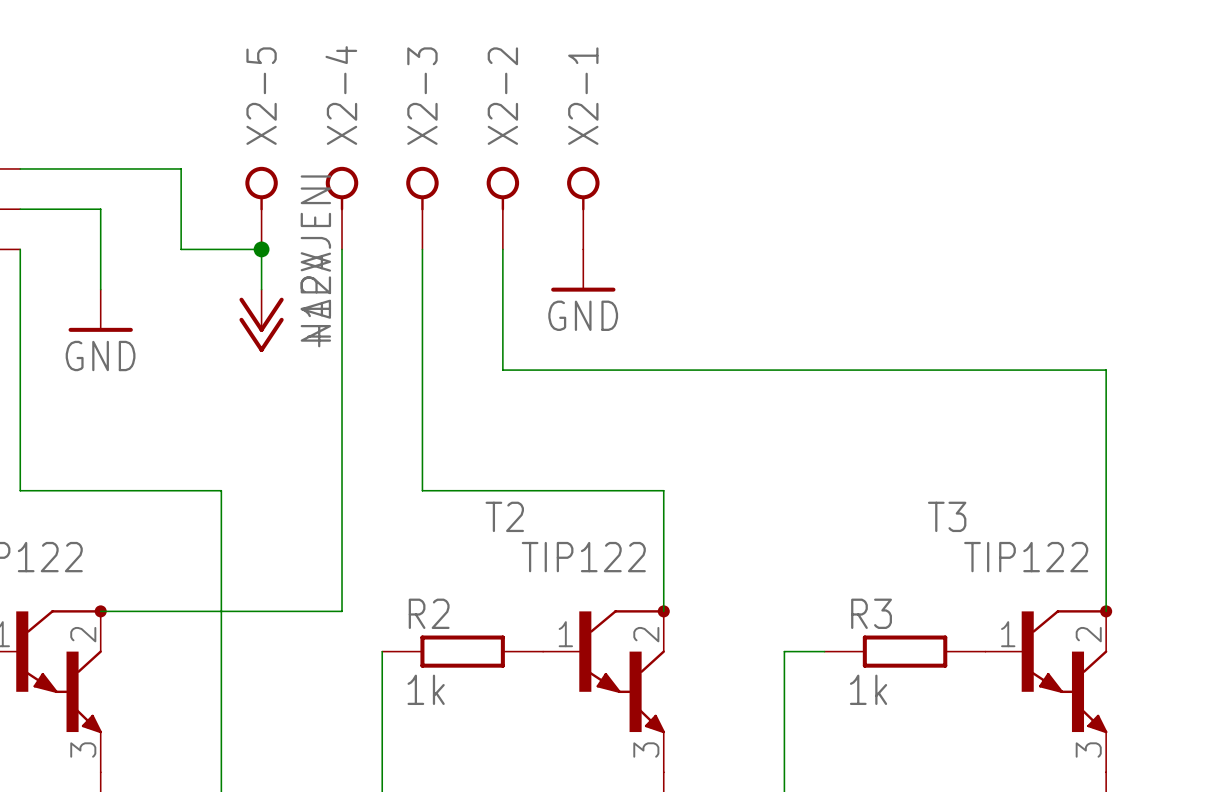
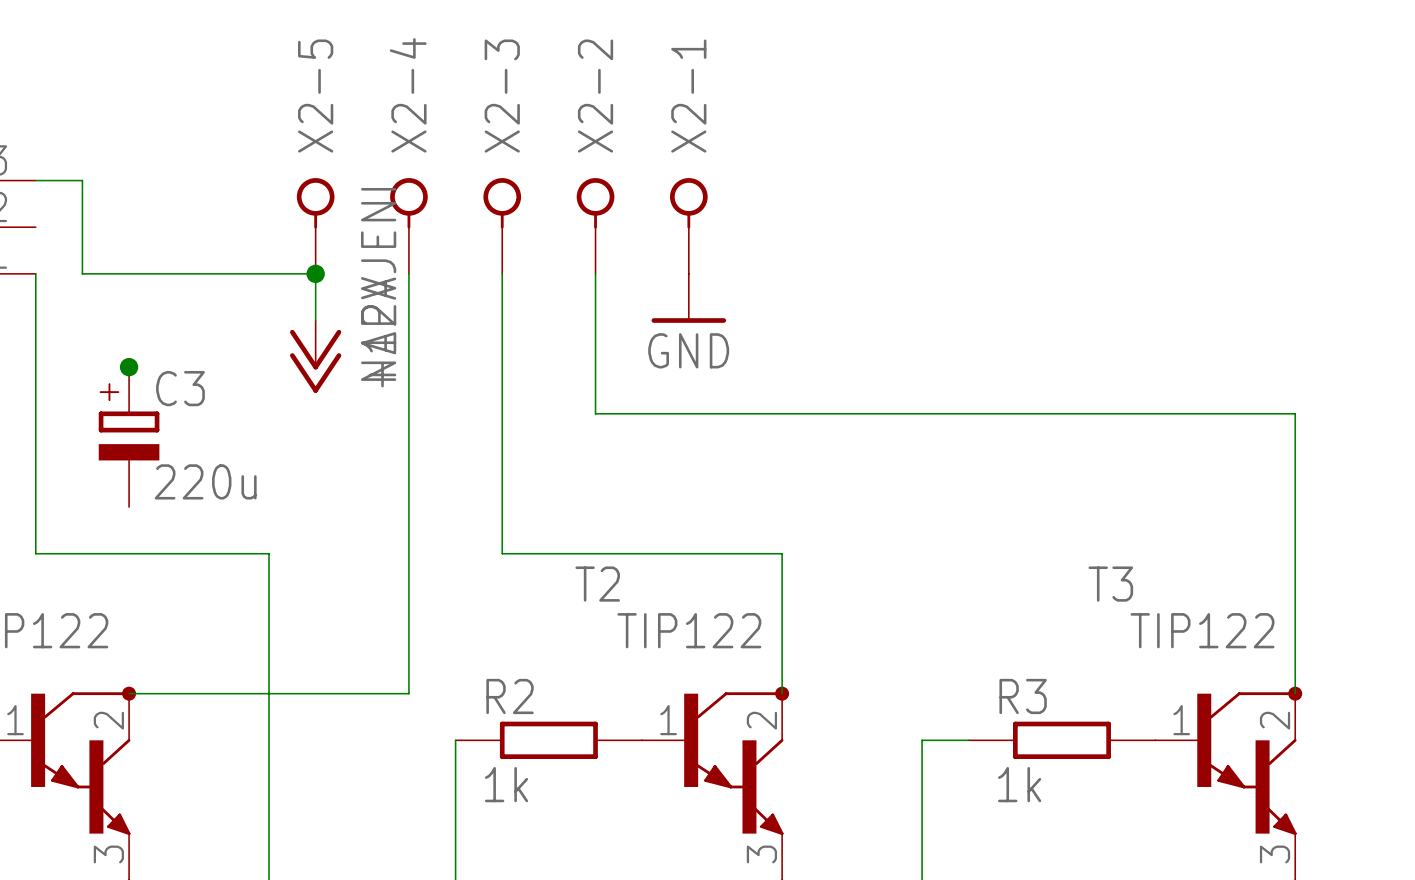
wire: (60, 168) (181, 168) (181, 249) -> (82, 180) (82, 273) (222, 273)
wire: (20, 209) (100, 209) (100, 289) -> none
power symbol: GND (100, 310) -> none
junction: none -> (129, 367)
C3: none -> 220u (129, 437)

